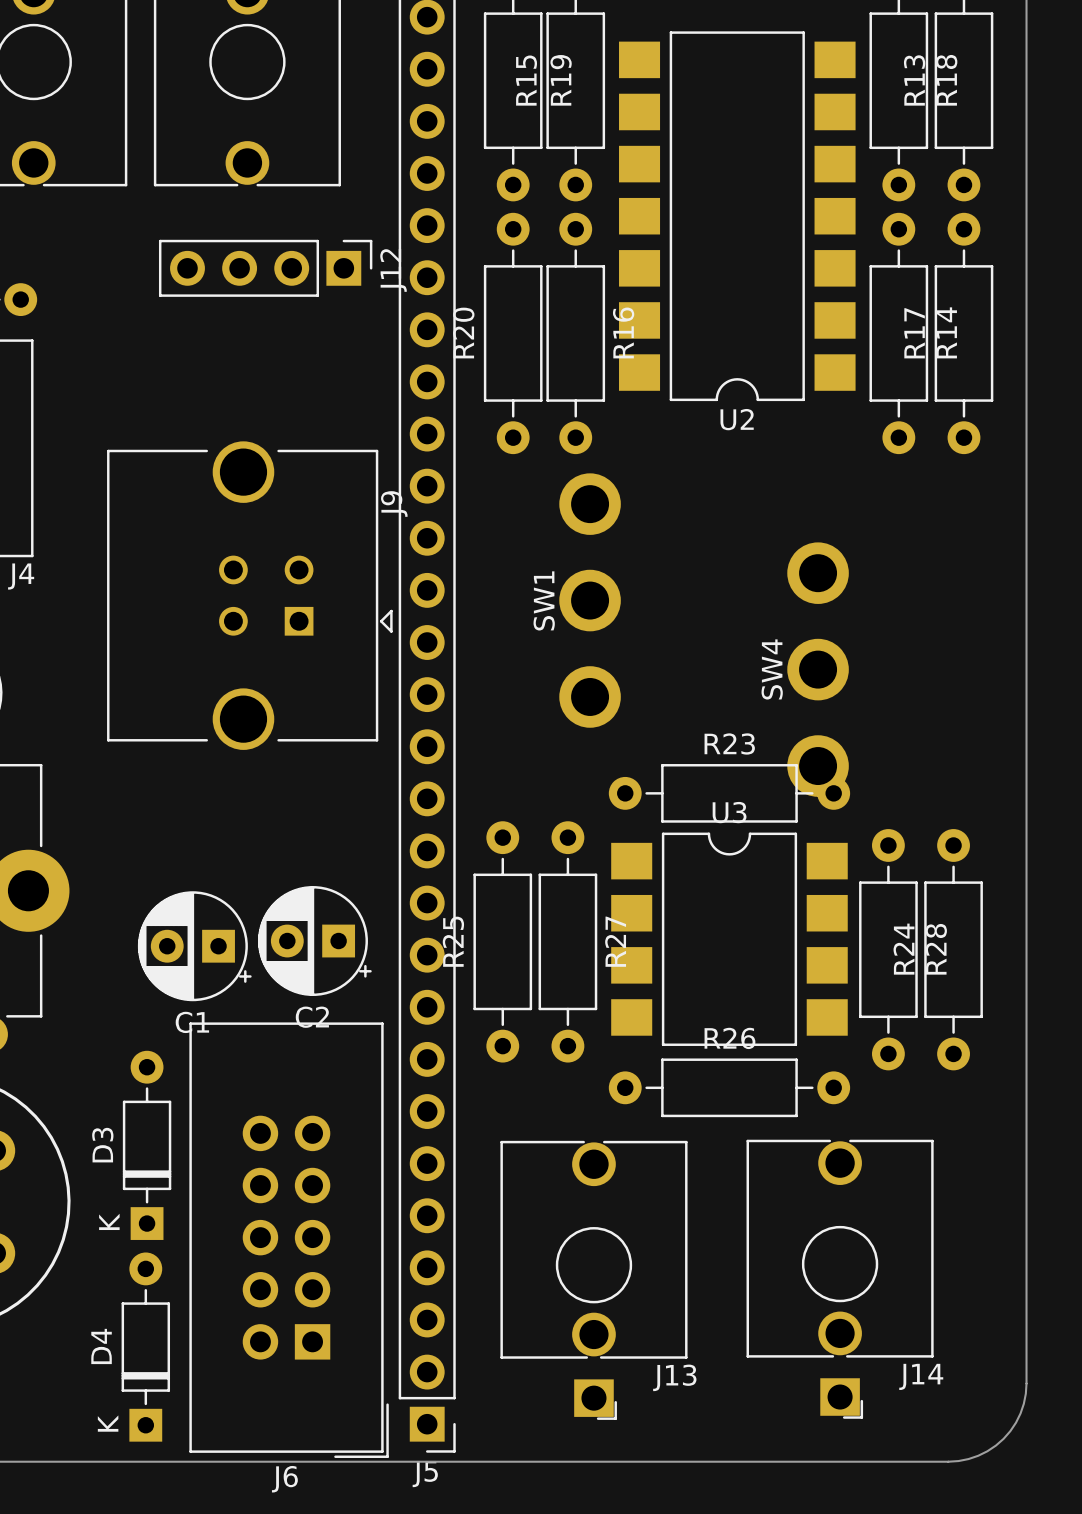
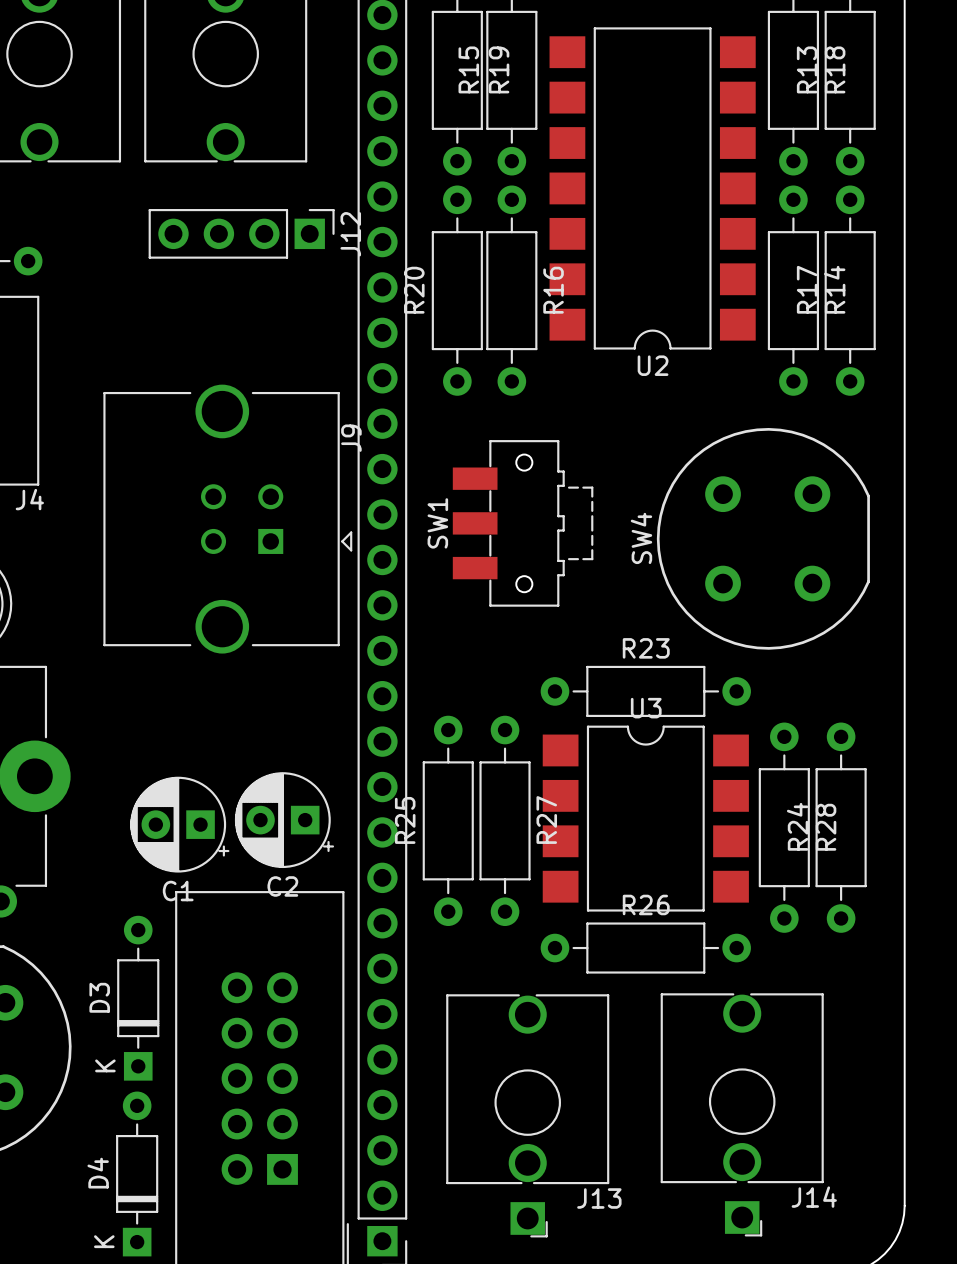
SW1 footprint: [559, 473, 621, 728] -> [452, 440, 594, 607]
SW4 footprint: [787, 542, 849, 797] -> [656, 428, 870, 650]
SW1 name position: SW1 (544, 600) -> SW1 (437, 523)
SW4 name position: SW4 (772, 669) -> SW4 (641, 538)

